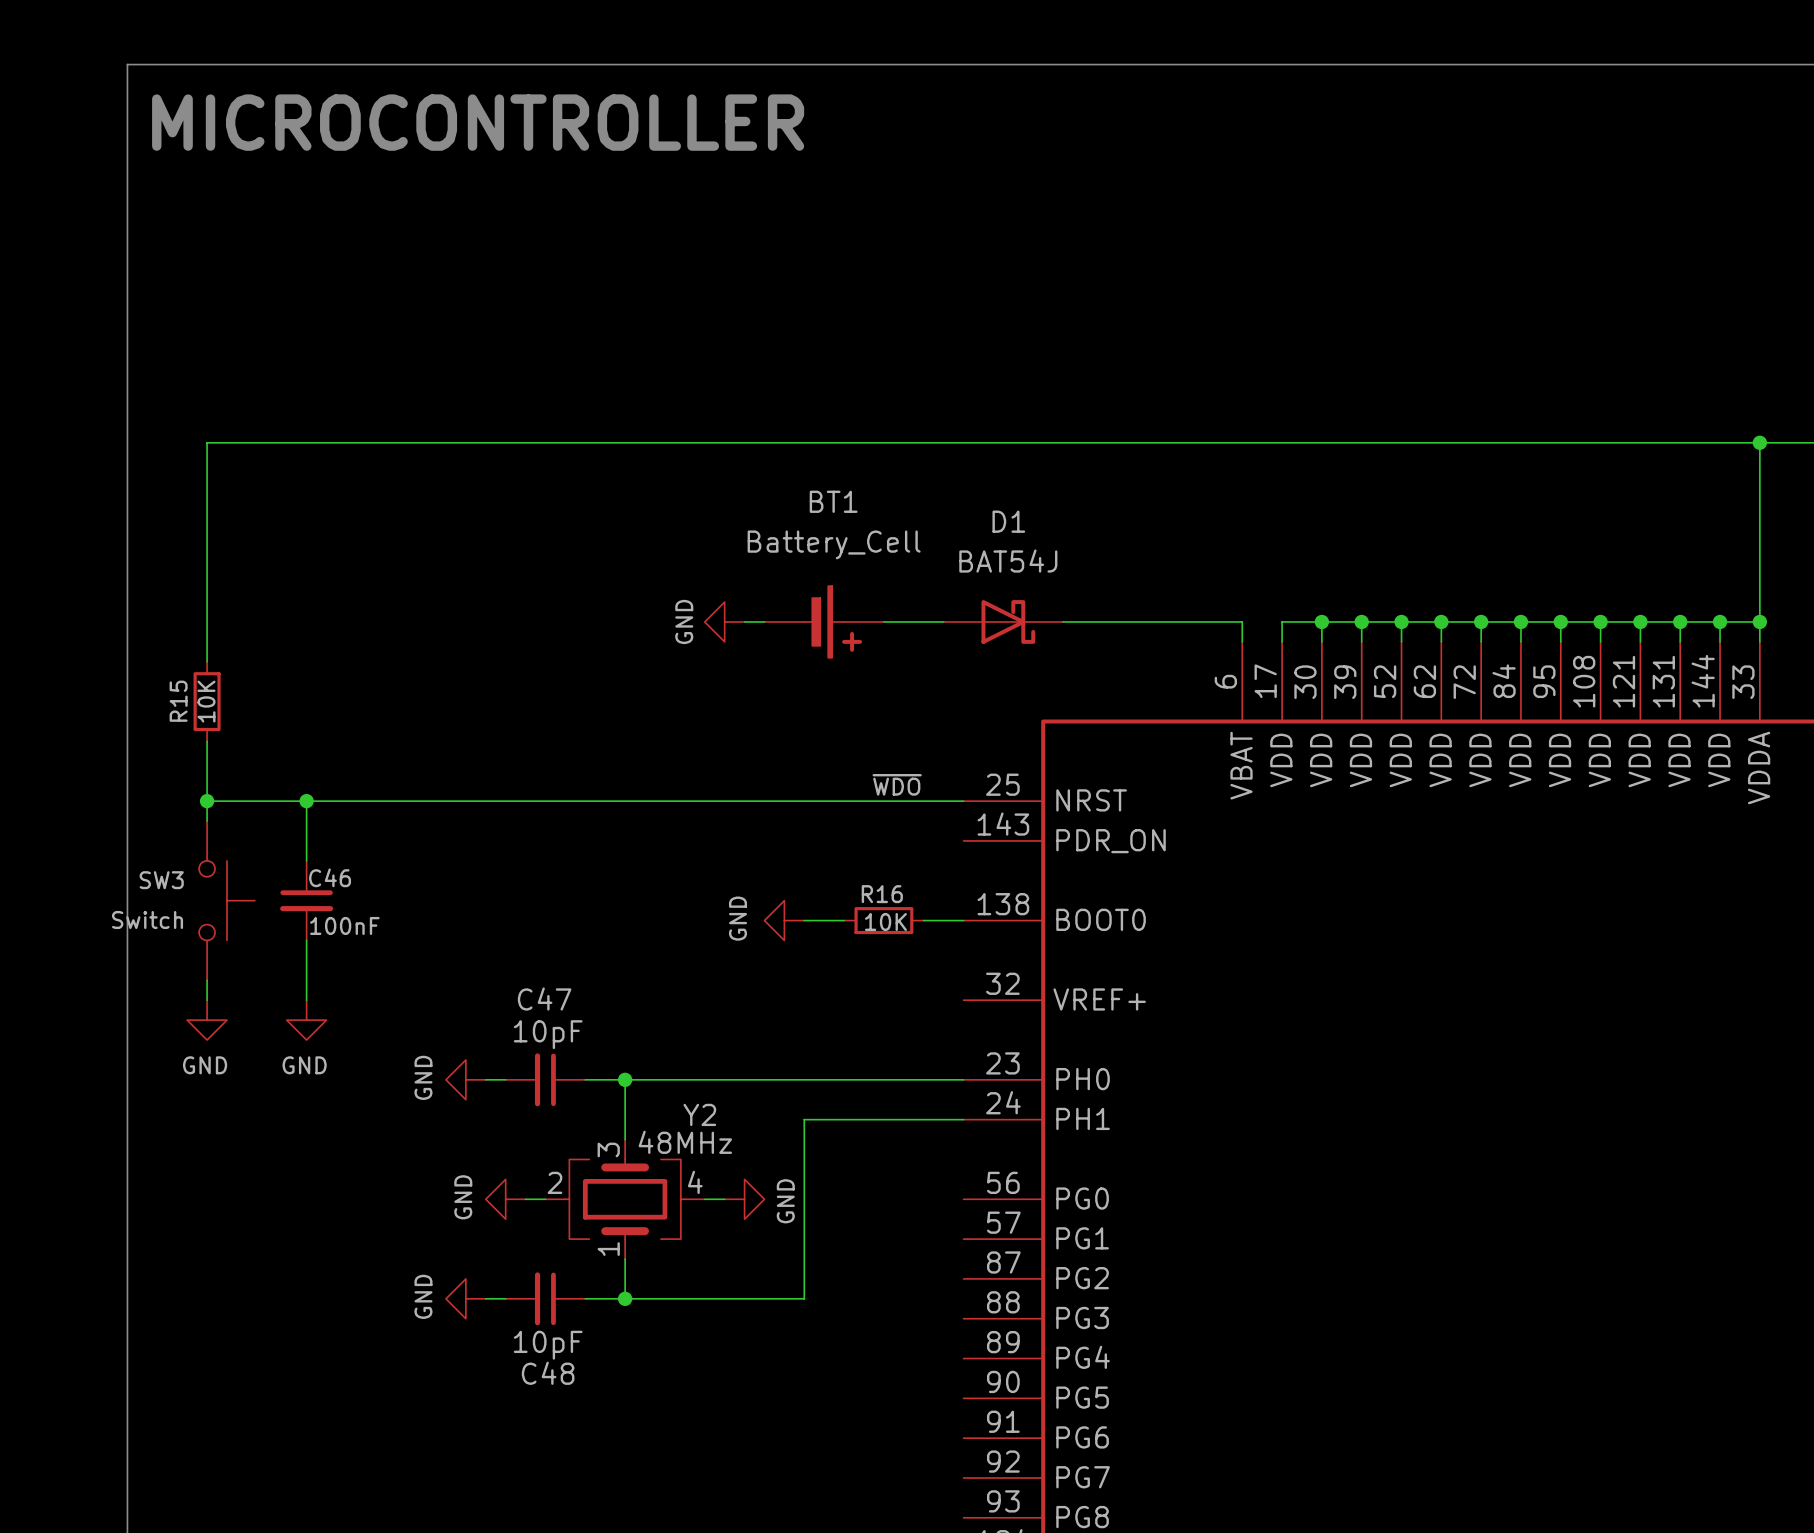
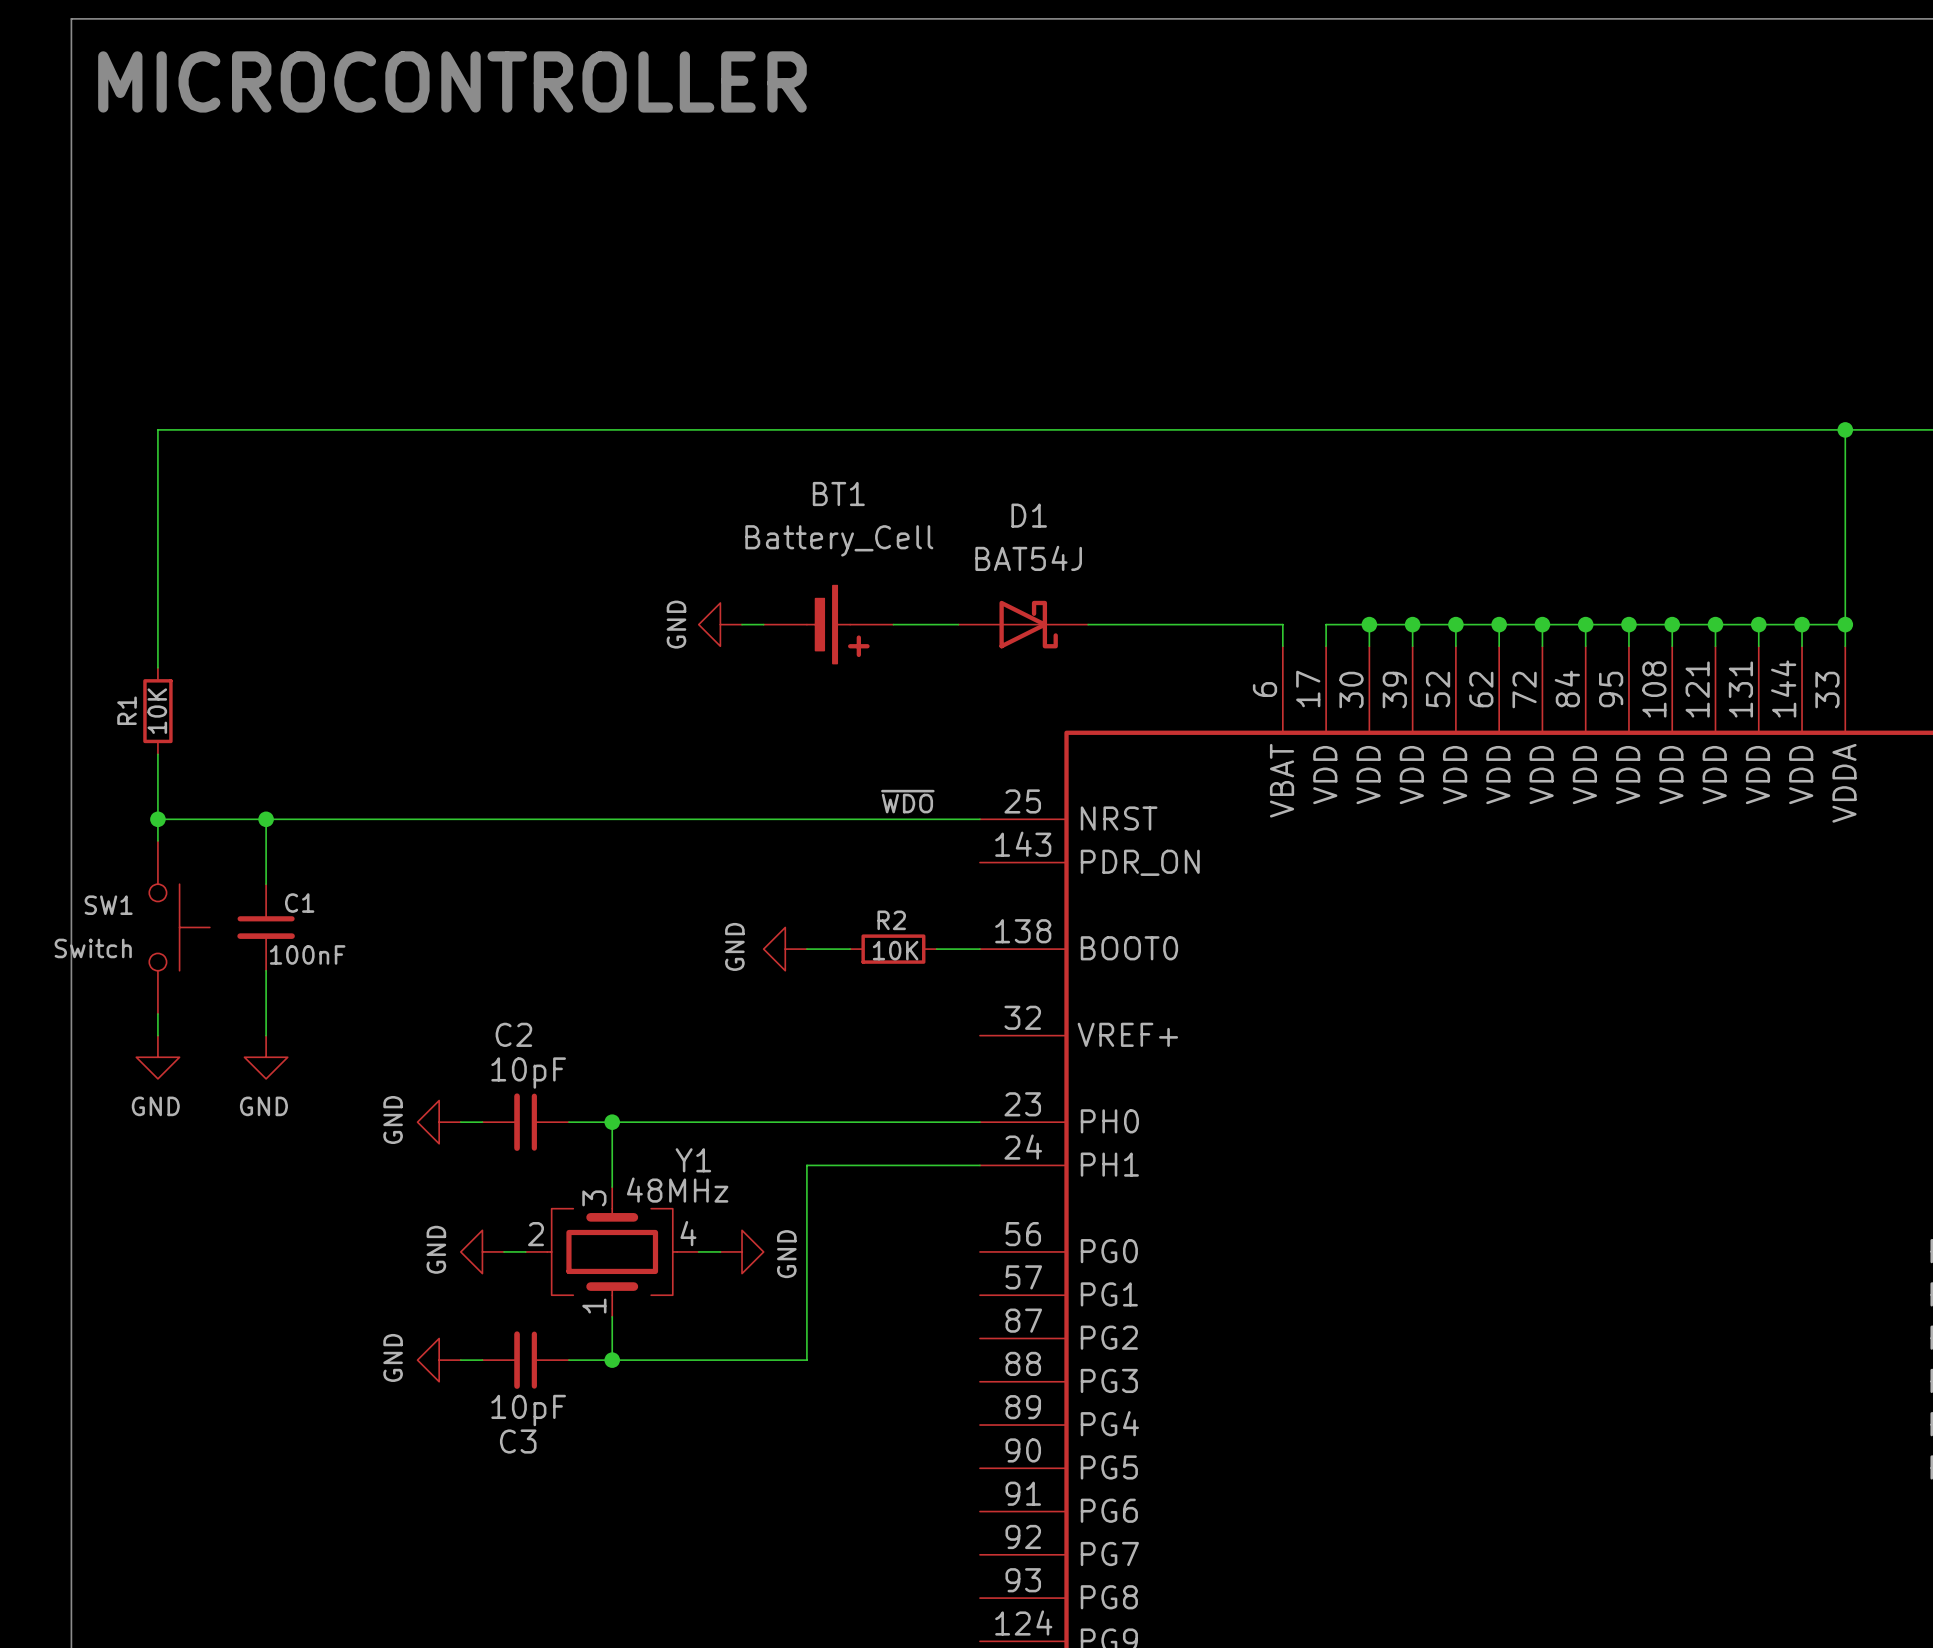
R15 name: R15 (178, 701) -> R1 (127, 710)
C46 name: C46 (330, 877) -> C1 (299, 903)
SW3 name: SW3 (161, 880) -> SW1 (108, 905)
R16 name: R16 (882, 894) -> R2 (891, 920)
C47 name: C47 (544, 998) -> C2 (513, 1034)
Y2 name: Y2 (699, 1114) -> Y1 (693, 1160)
C48 name: C48 (548, 1373) -> C3 (518, 1441)

